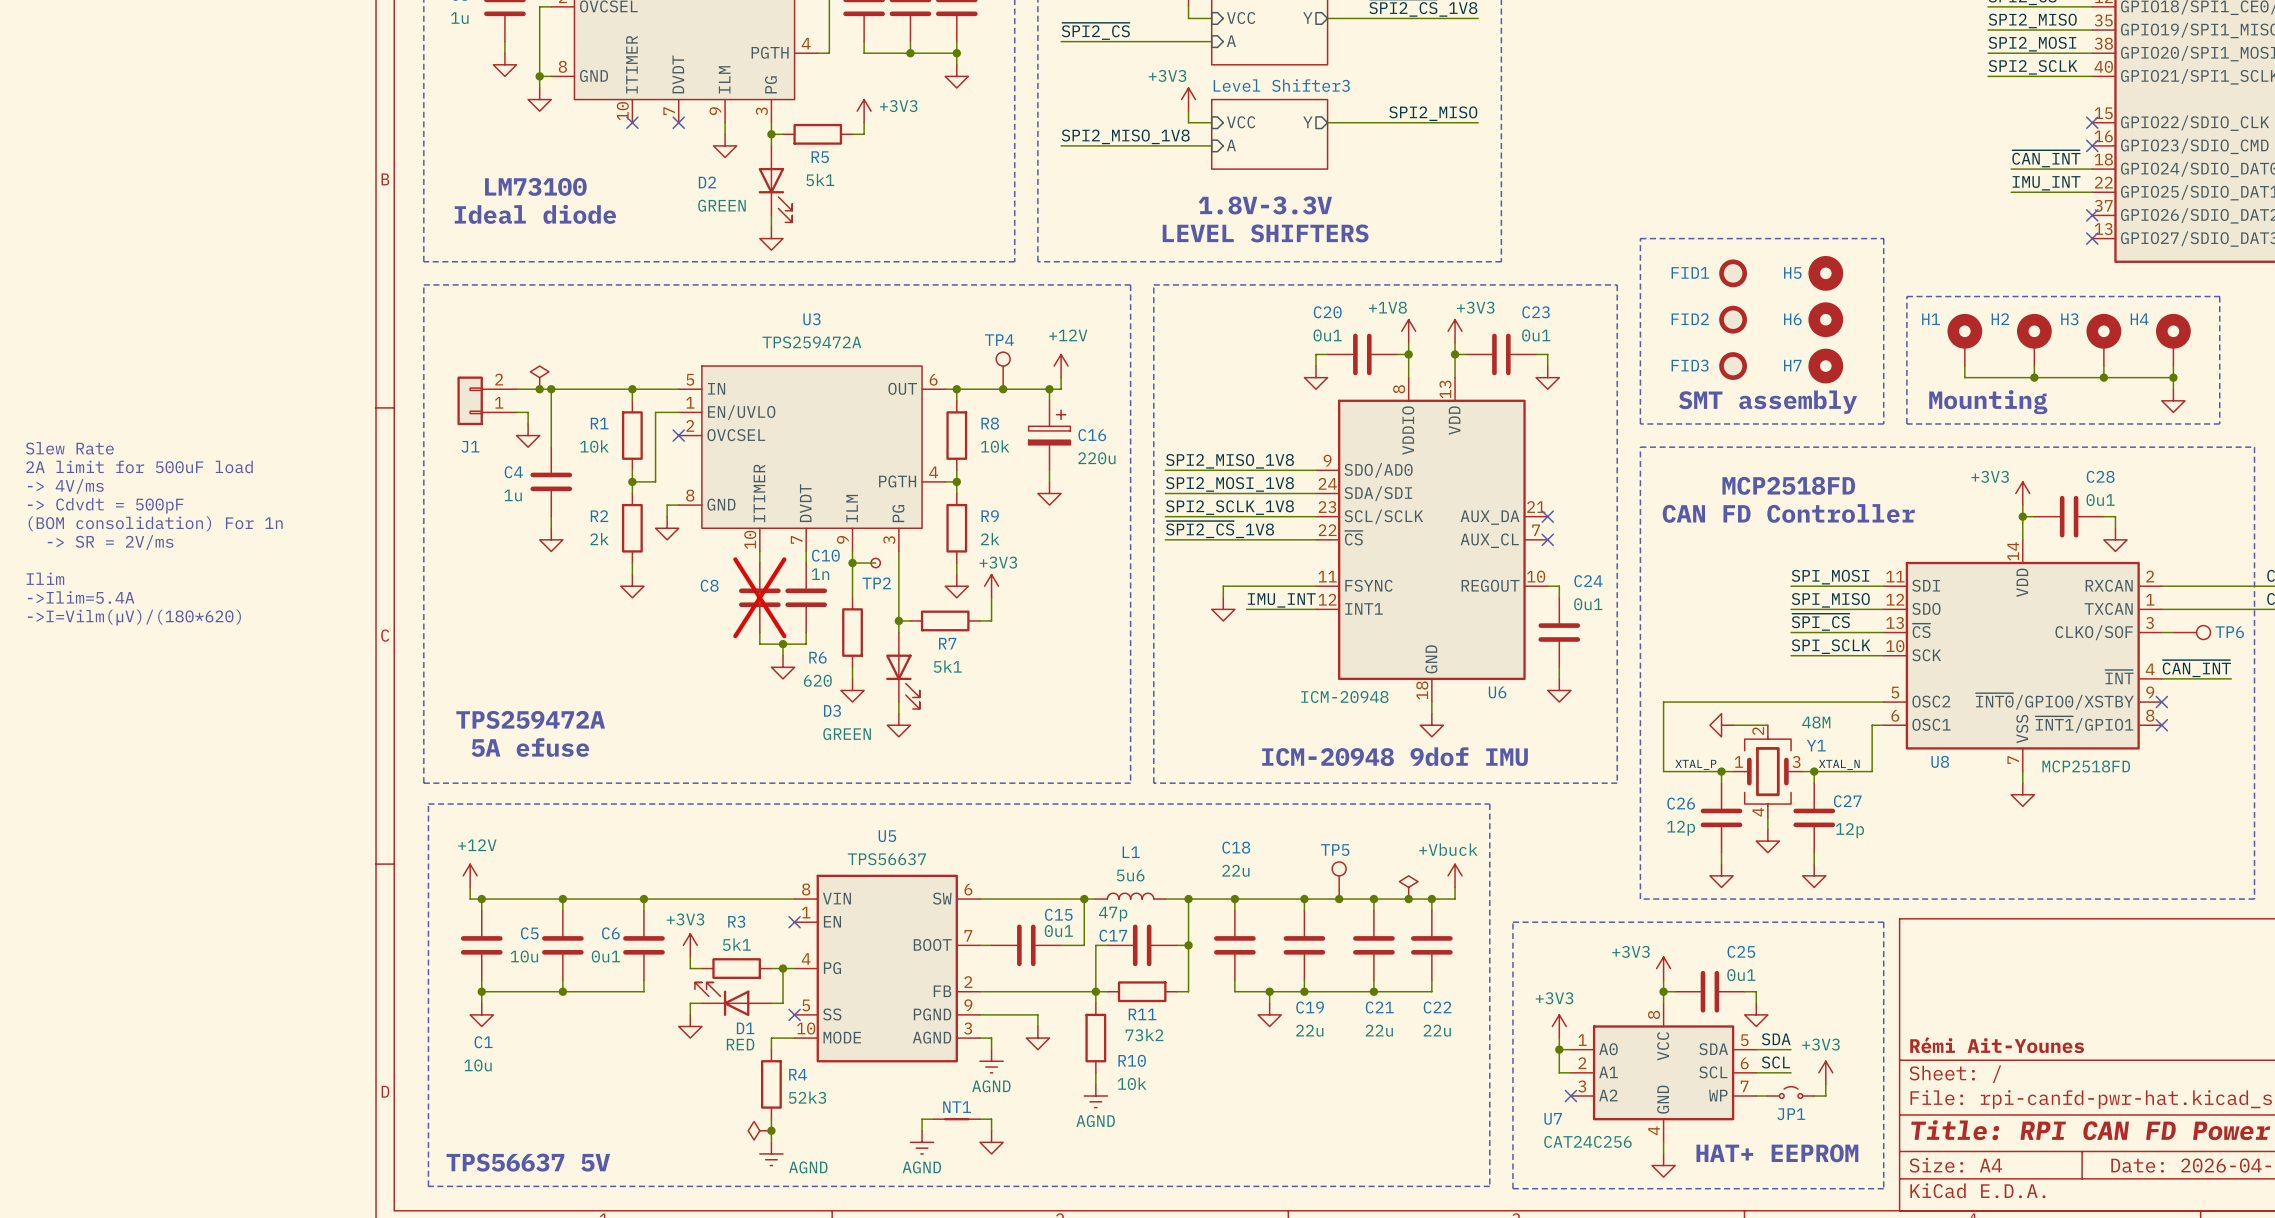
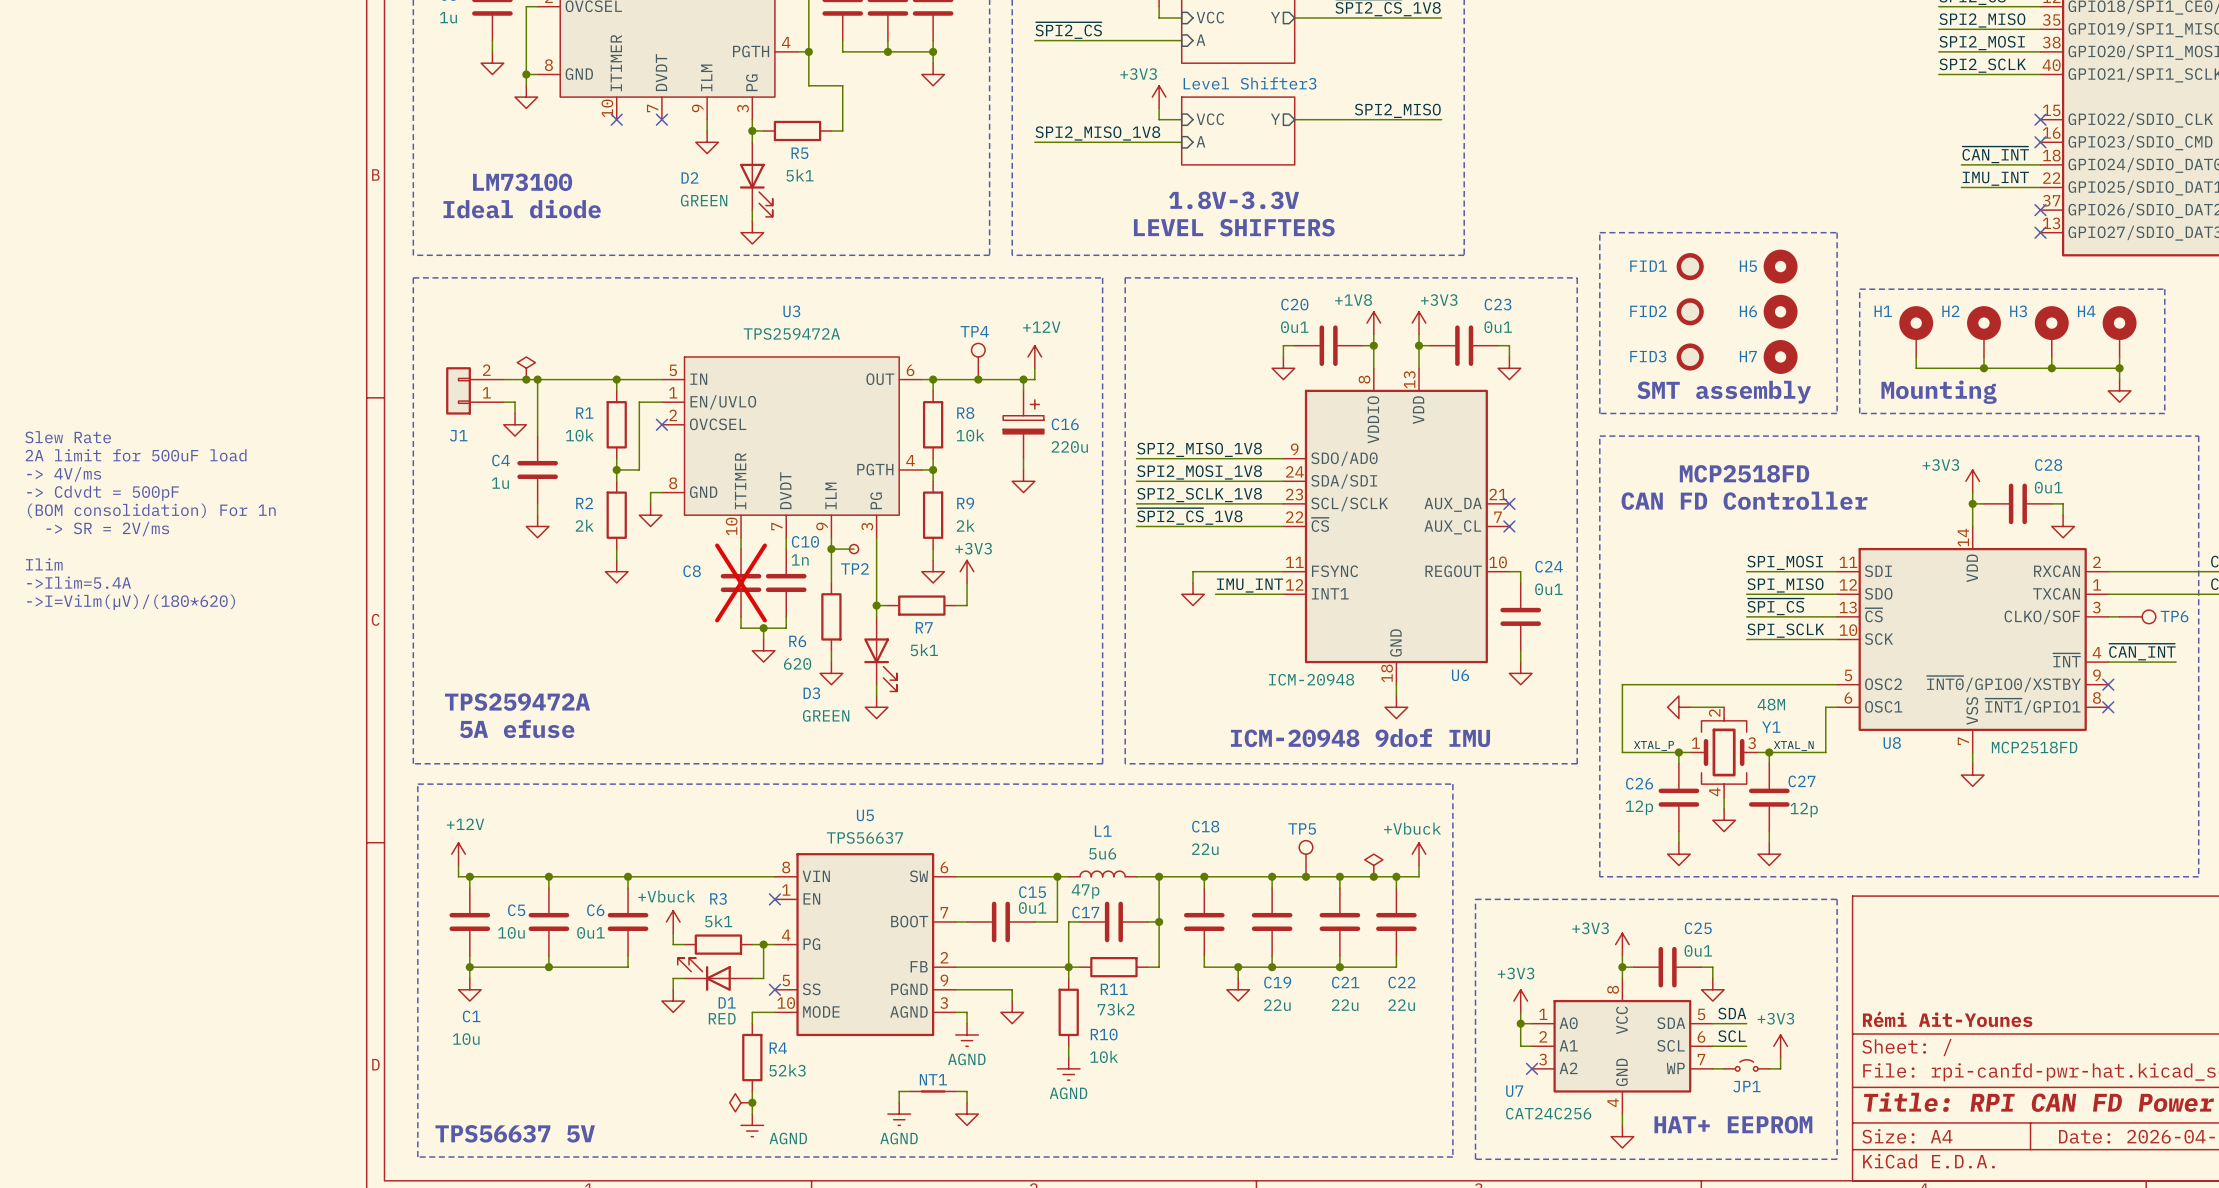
wire: none -> (808, 51) (808, 85) (842, 85) (842, 119)
junction: none -> (808, 51)
power symbol: +3V3 (864, 111) -> none
power symbol: +3V3 (690, 945) -> +Vbuck (673, 921)

